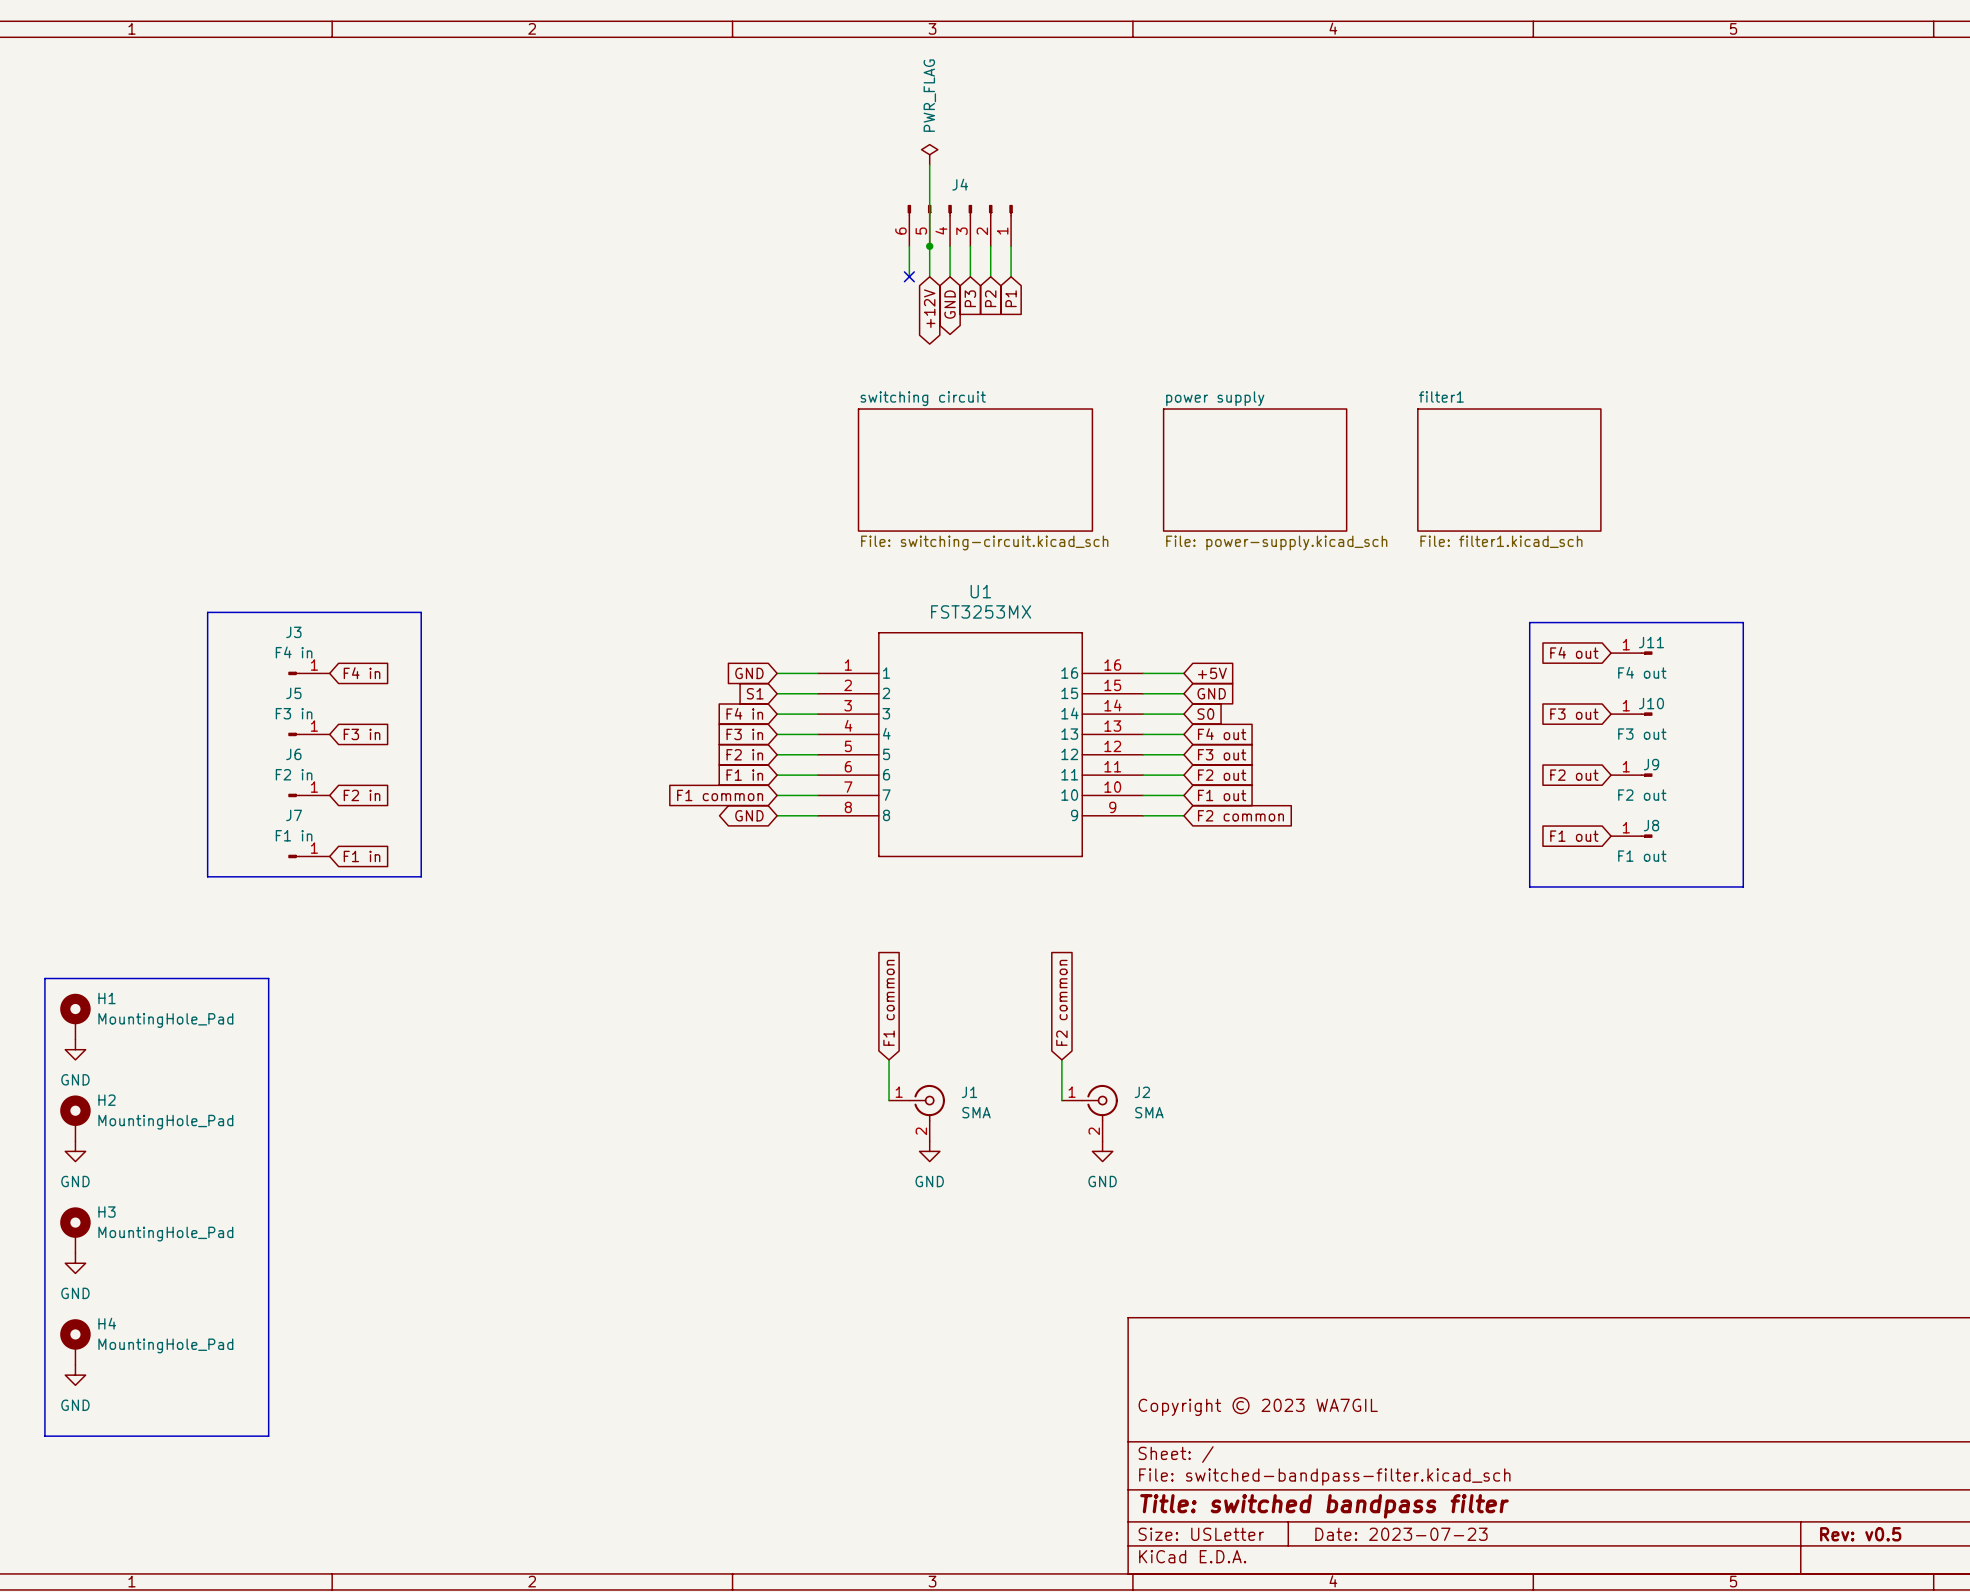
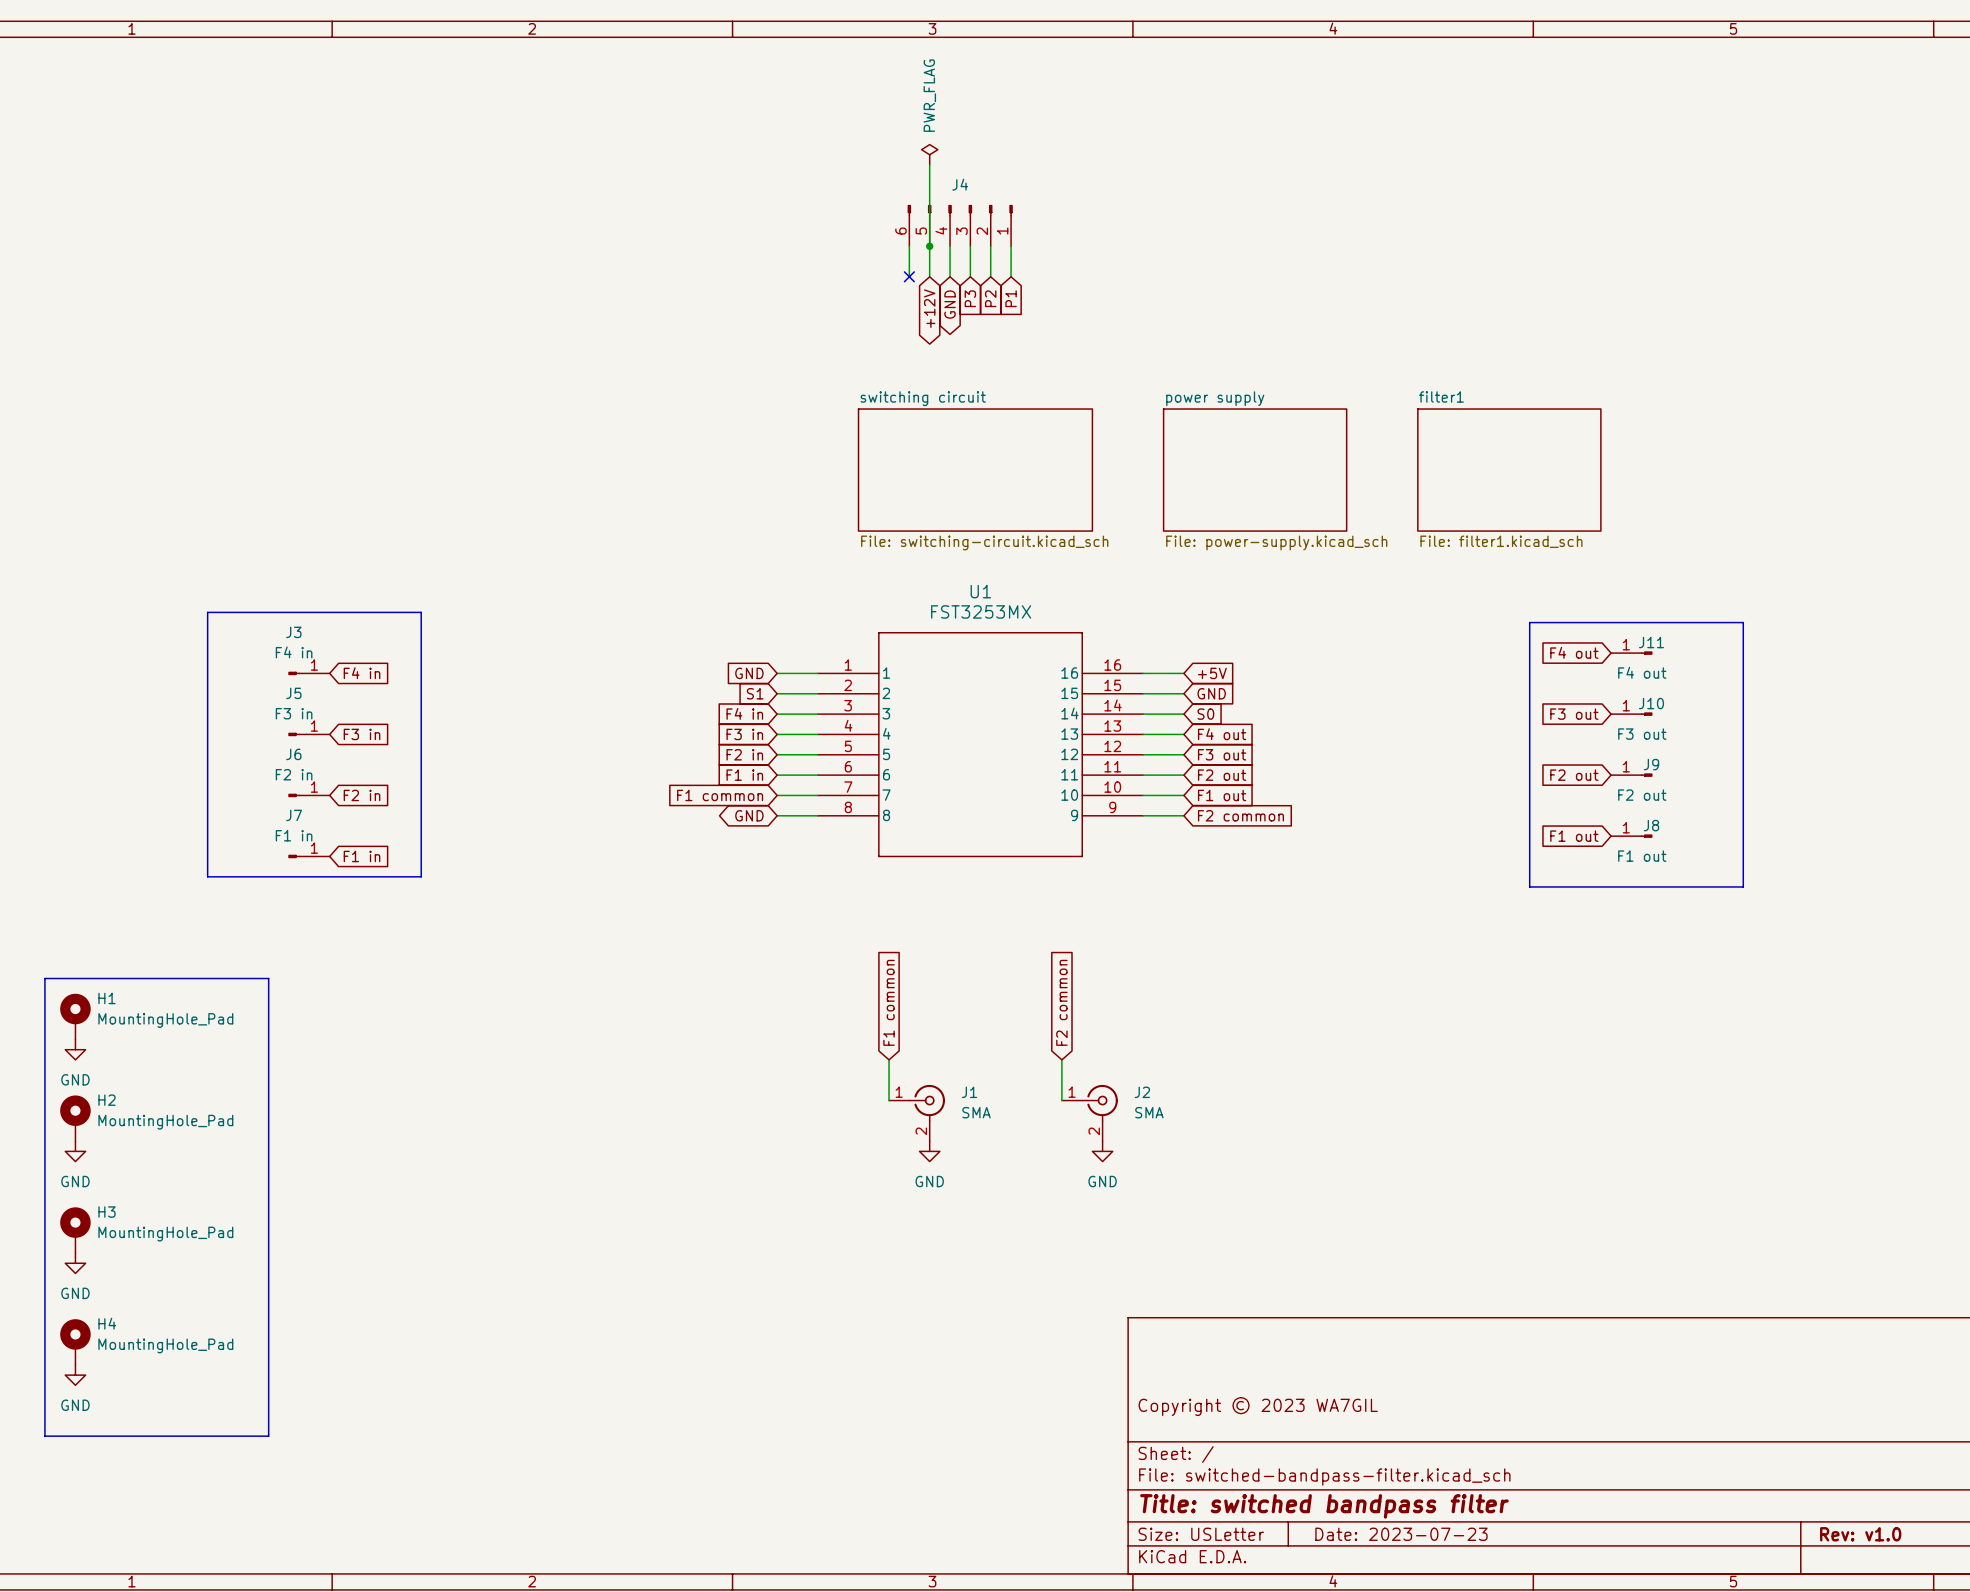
title block: Rev: v0.5 (1860, 1534) -> Rev: v1.0 (1860, 1534)

